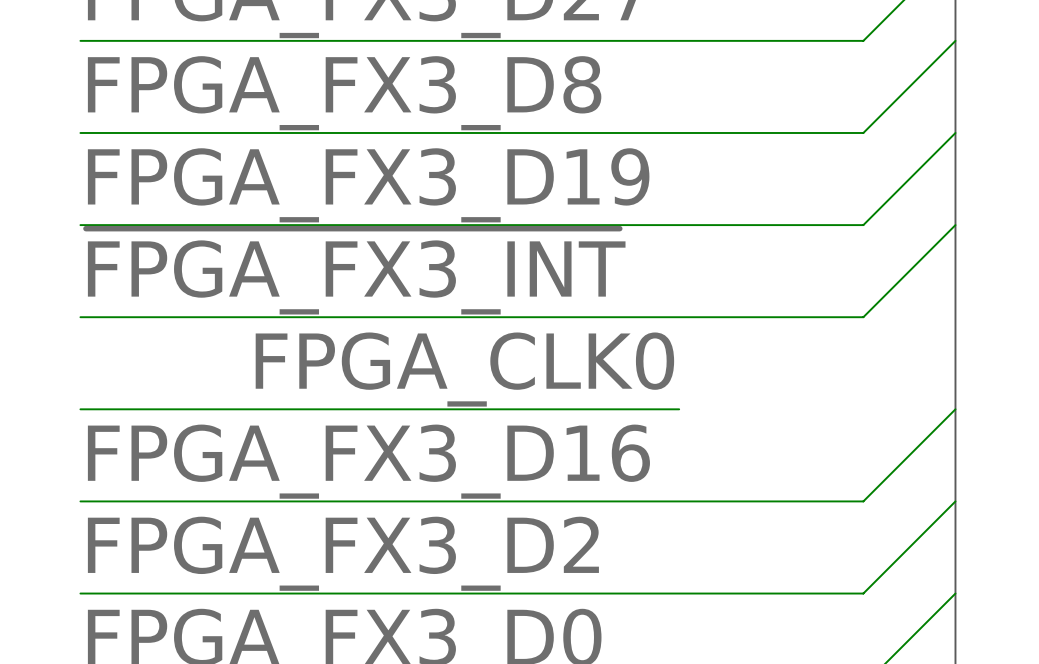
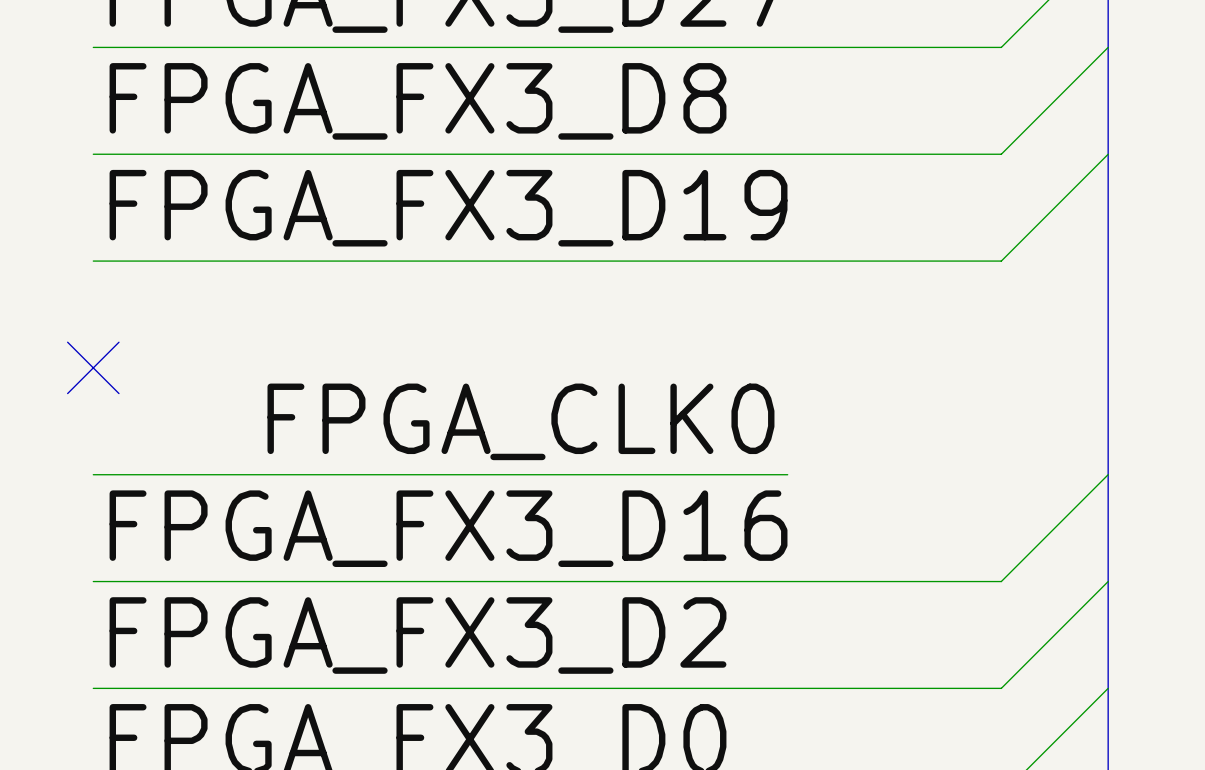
wire: (955, 225) (863, 317) (80, 317) -> none
label: ~{FPGA_FX3_INT} (355, 271) -> none
no-connect mark: none -> (93, 367)

